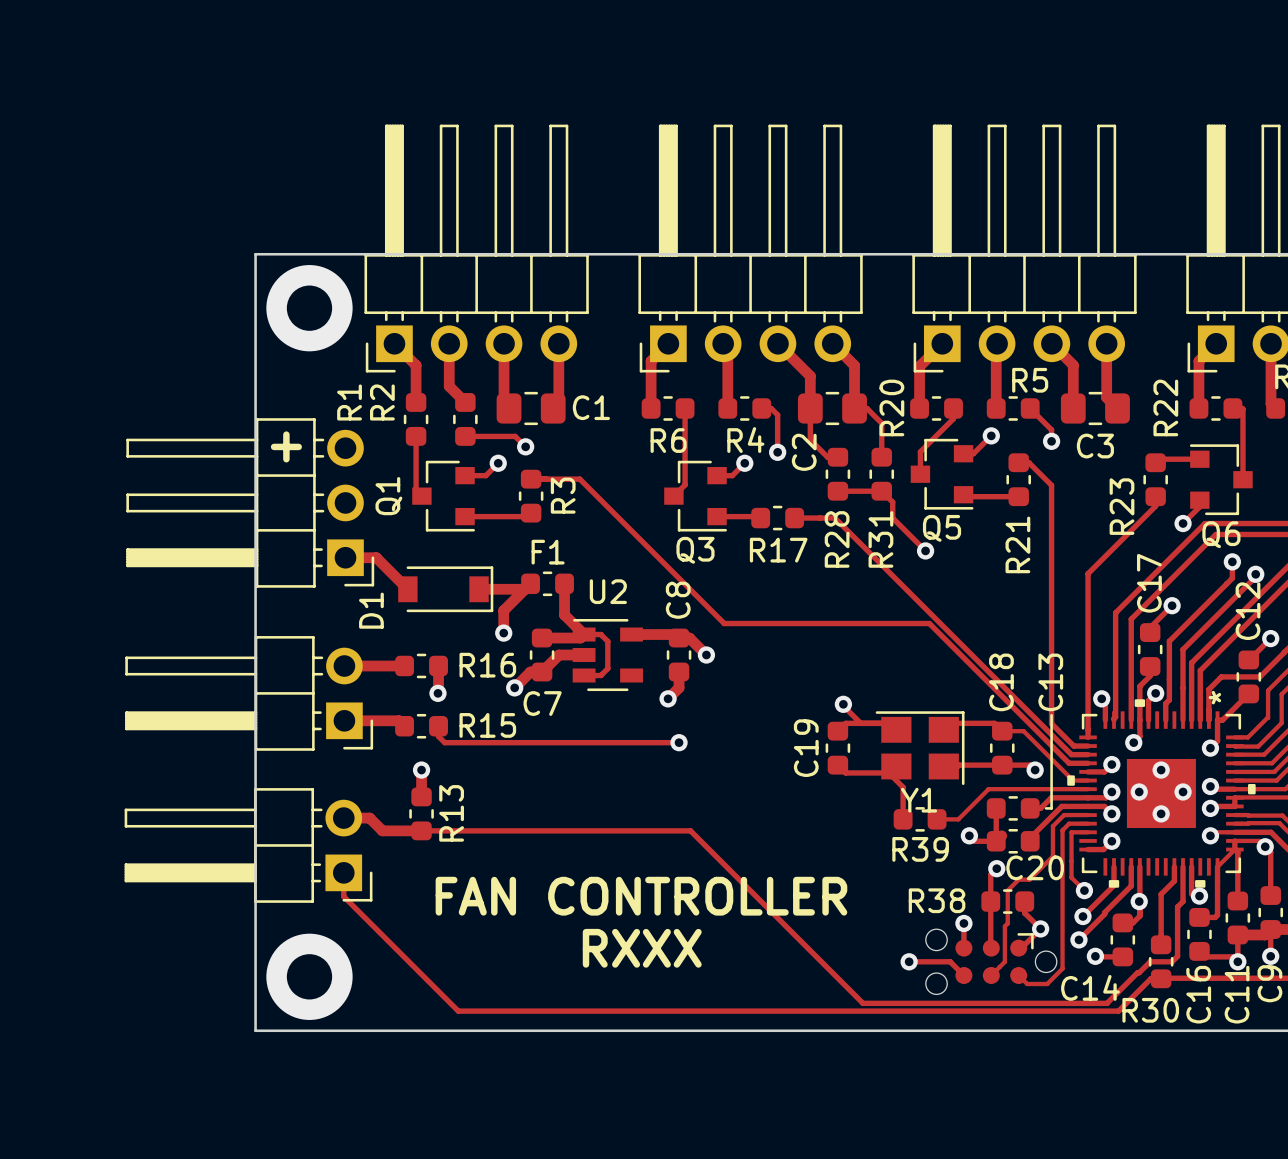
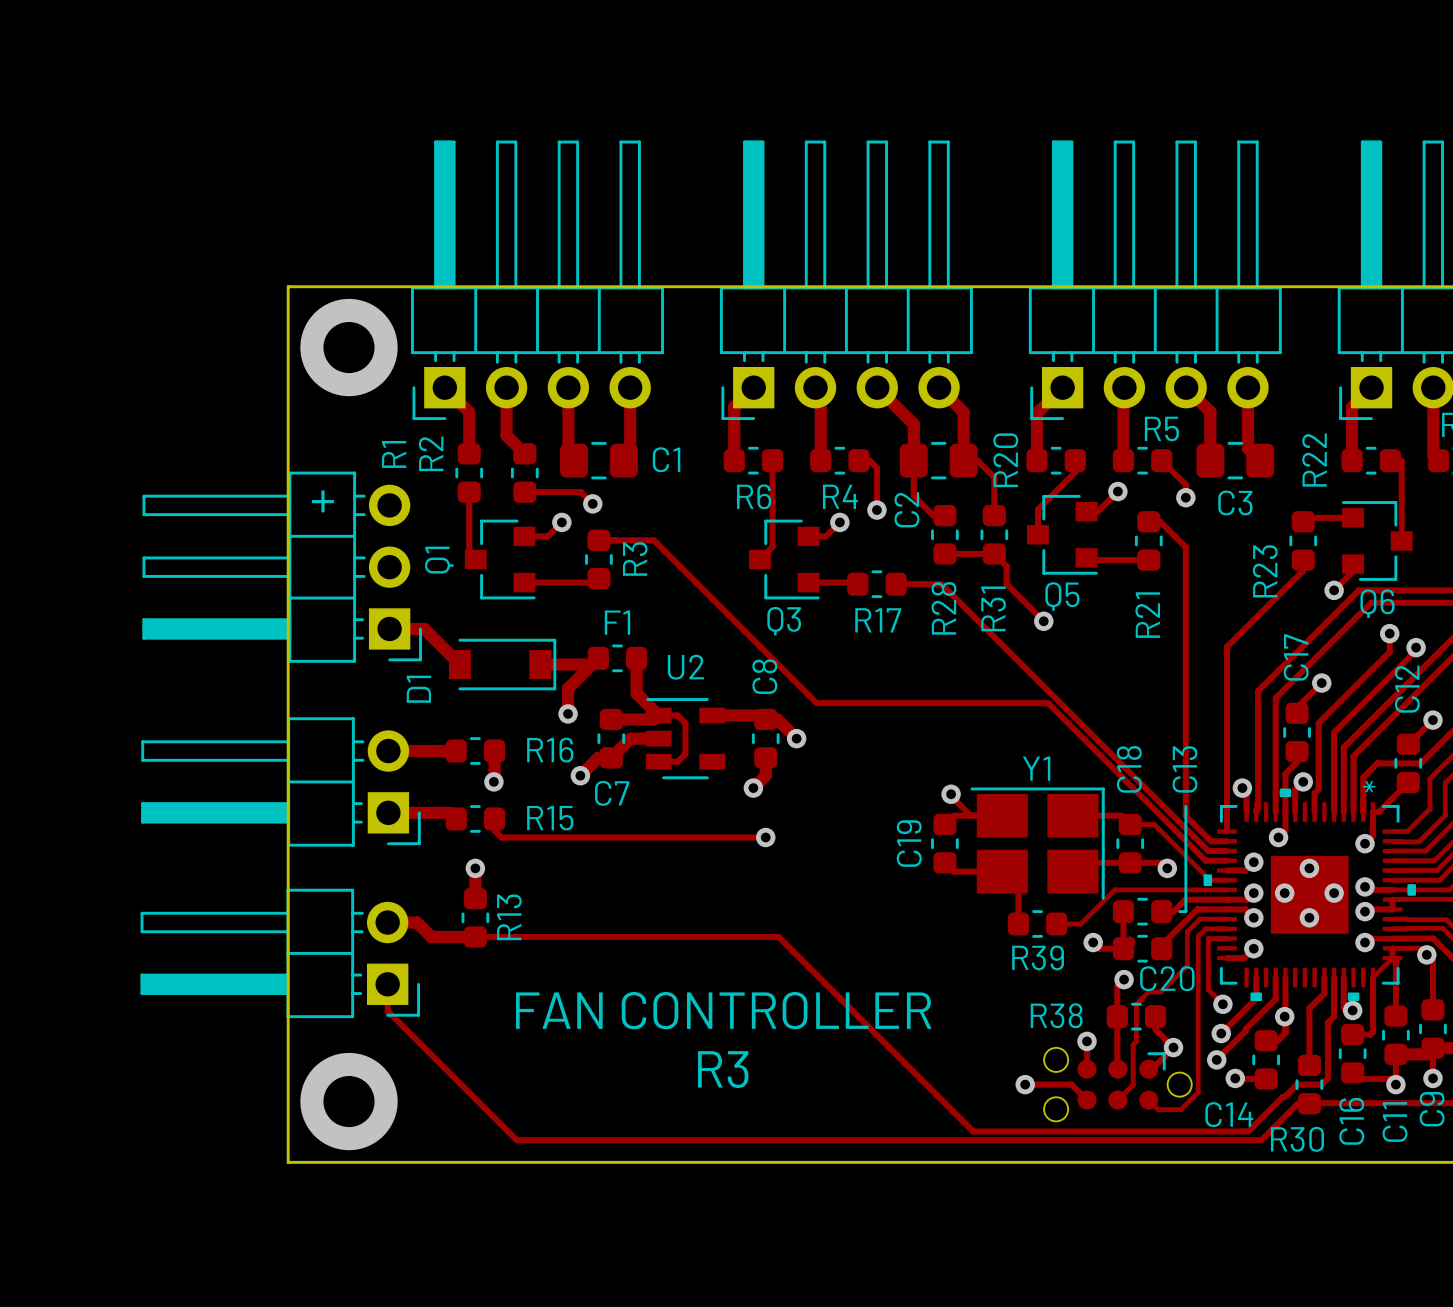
Y1 footprint: [875, 711, 965, 786] -> [970, 787, 1105, 900]
Y1 name position: Y1 (919, 800) -> Y1 (1036, 768)
text: RXXX (642, 948) -> R3 (723, 1069)

